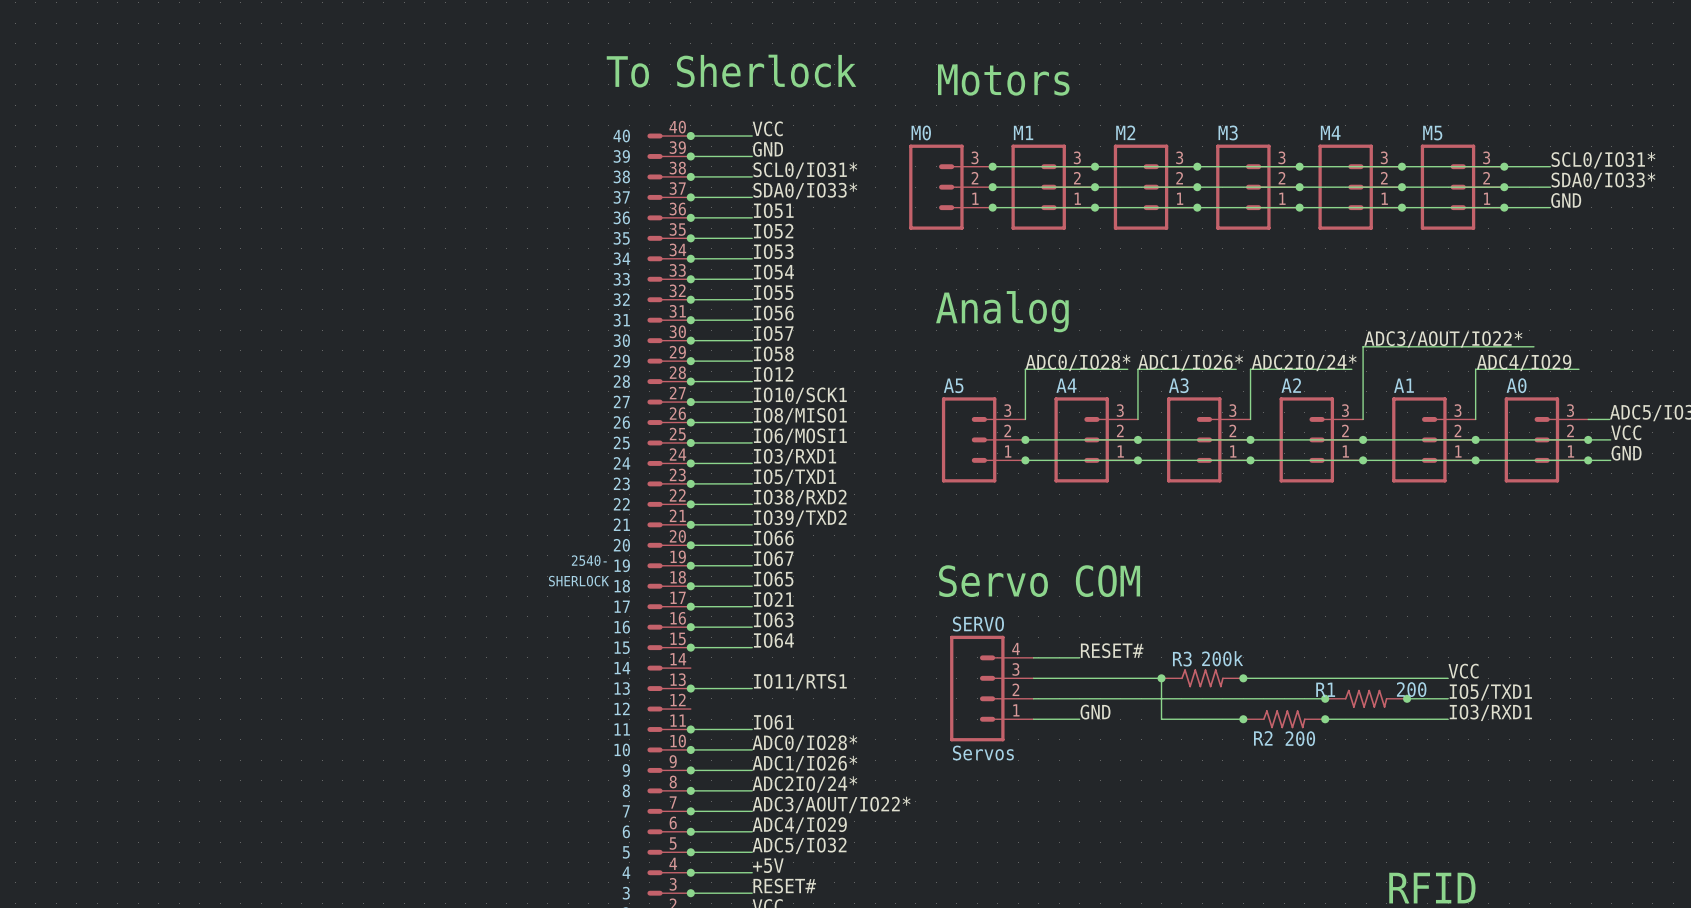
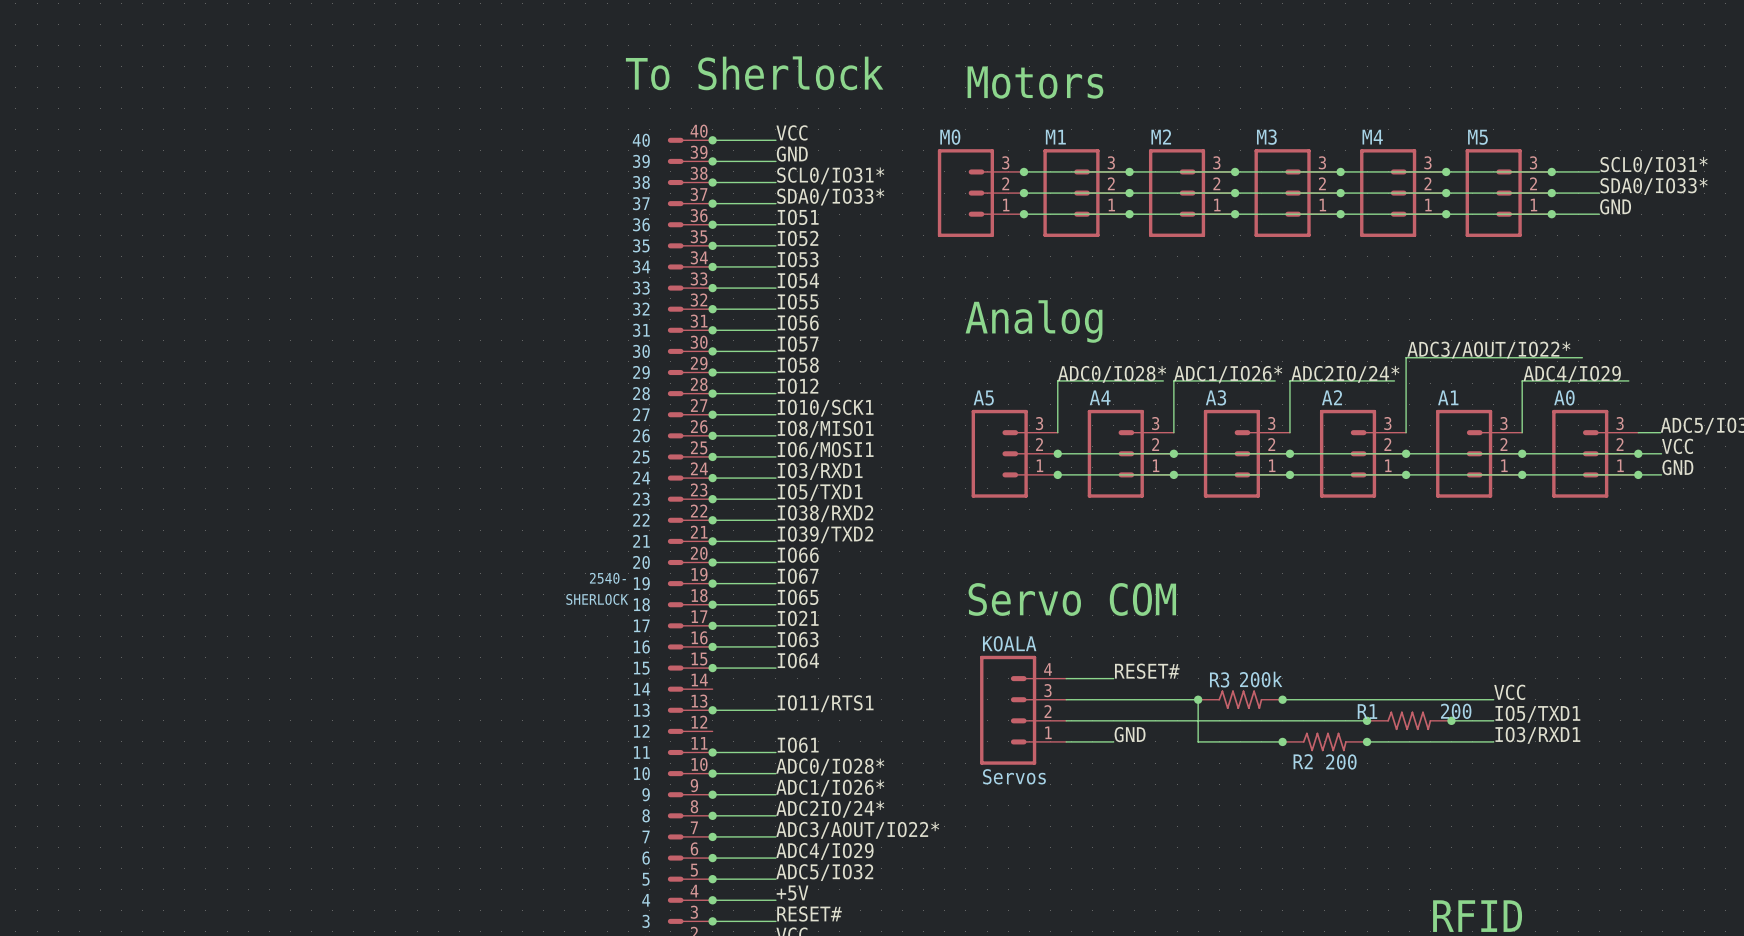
SERVO name: SERVO (978, 624) -> KOALA (1009, 643)

